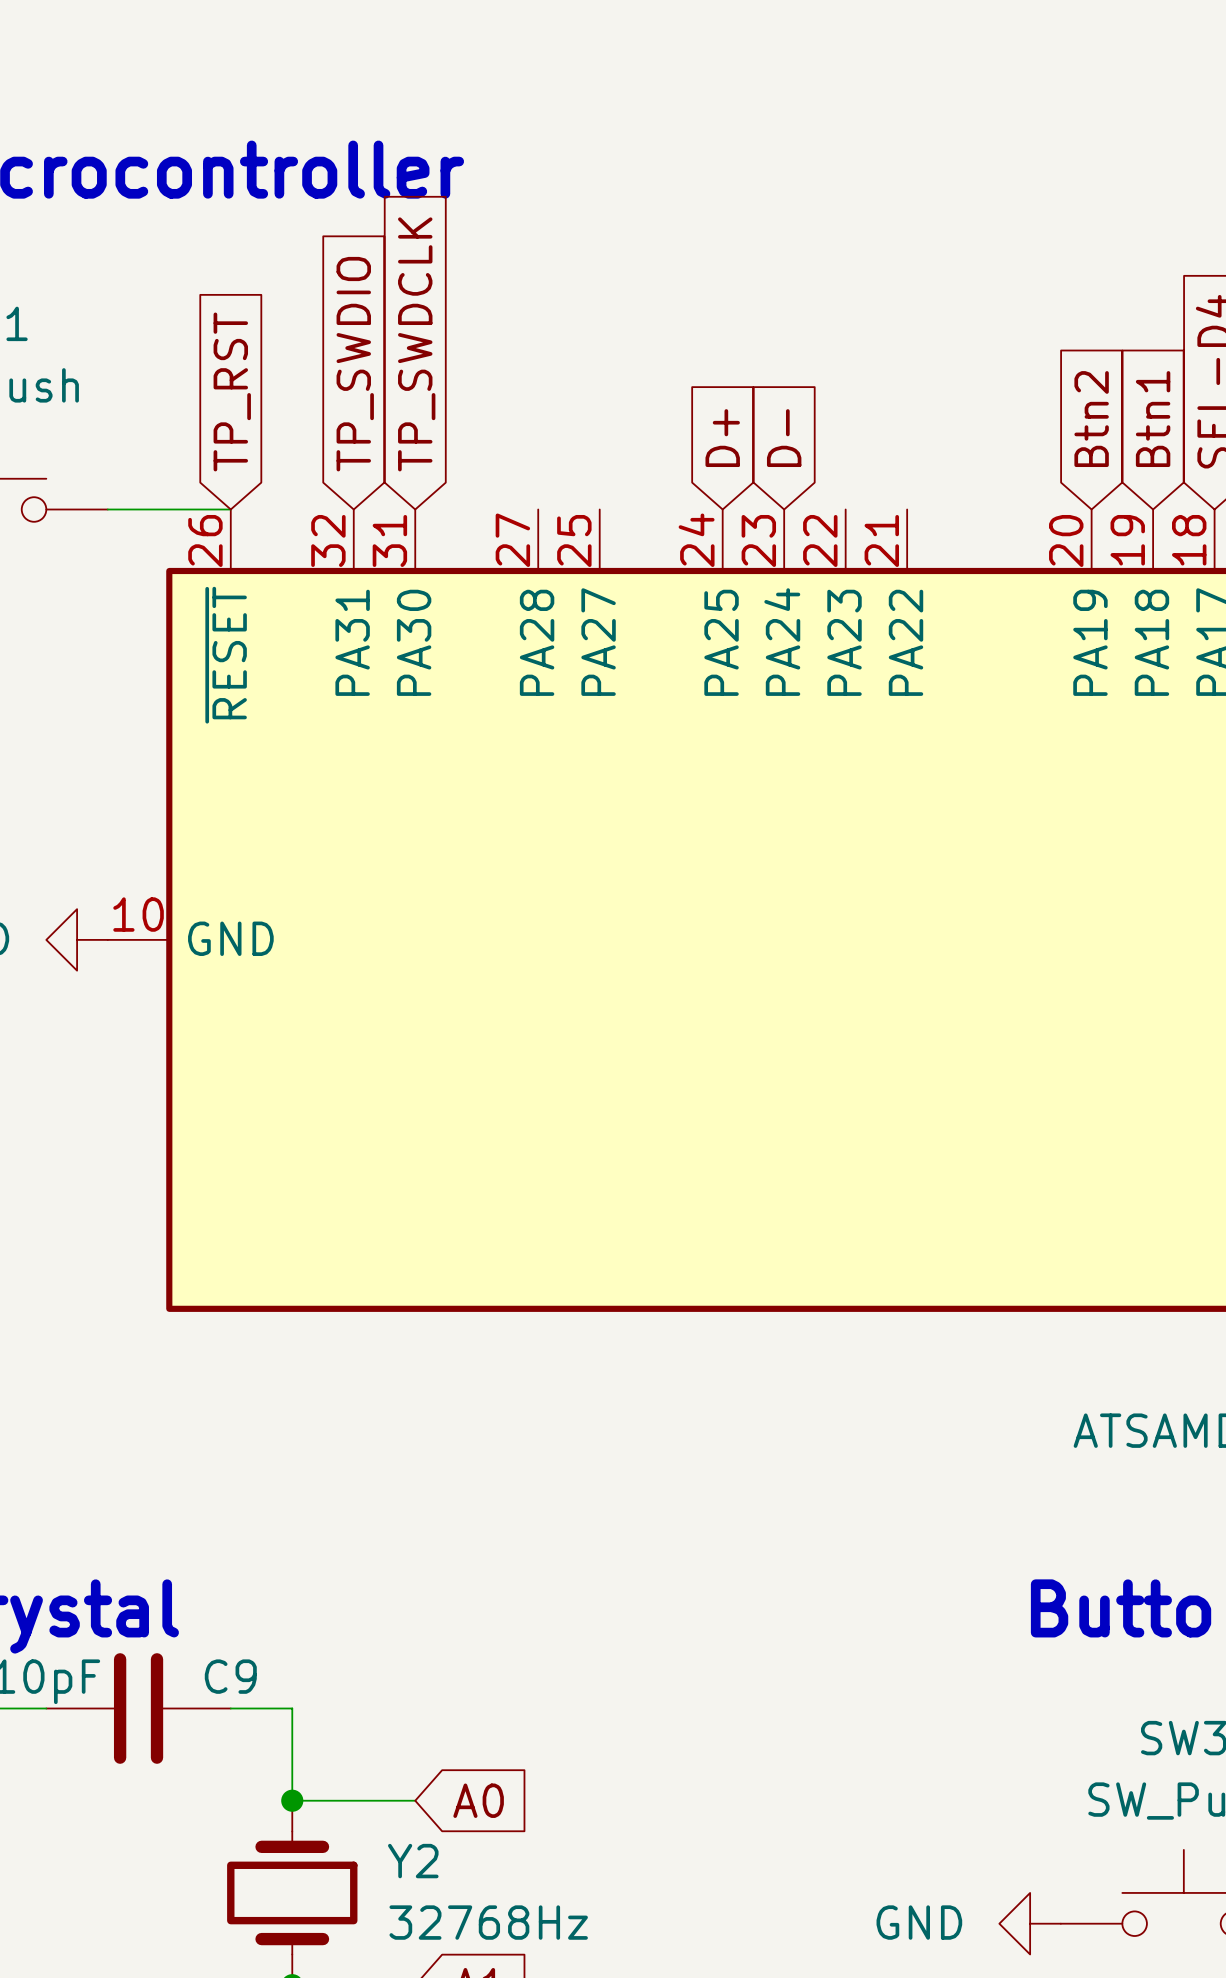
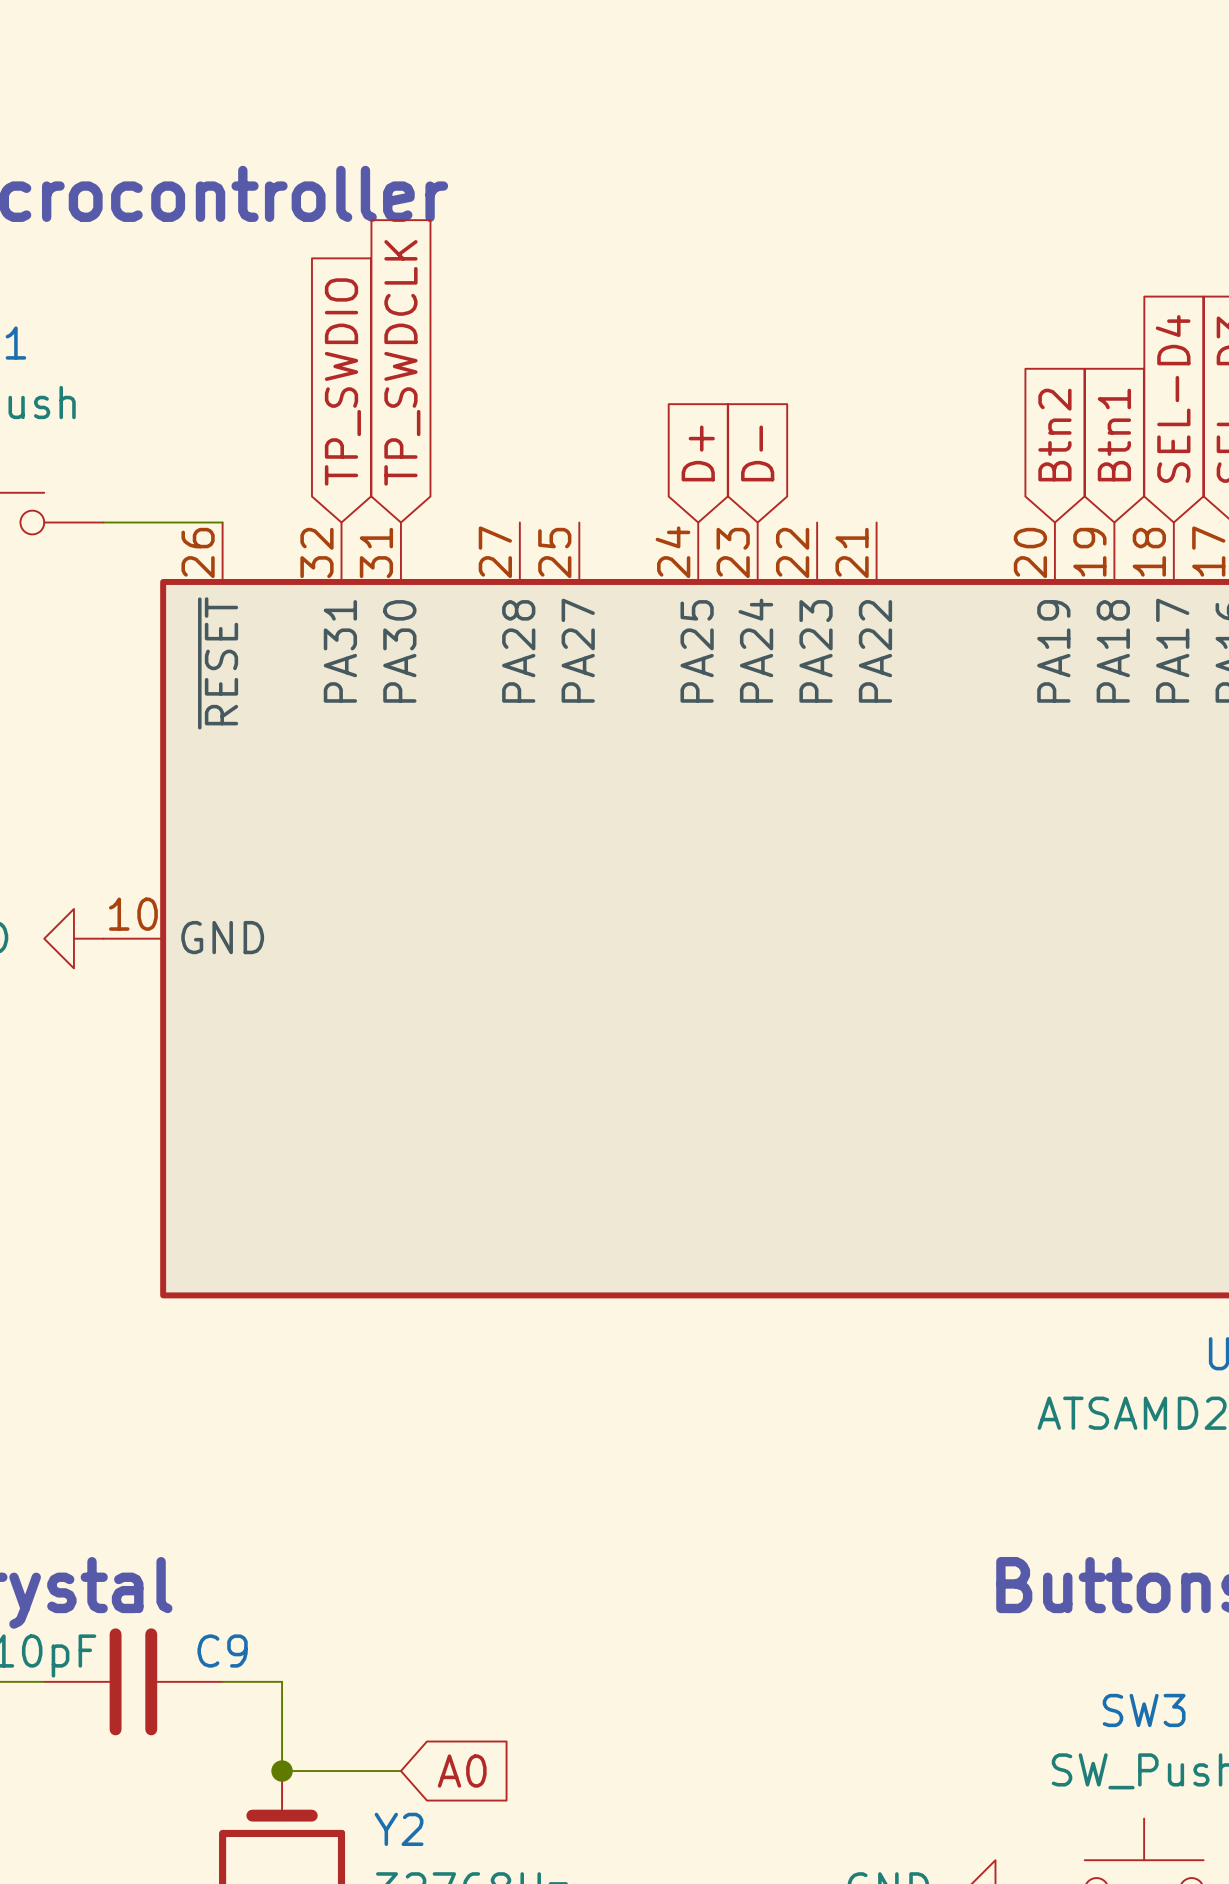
global label: TP_RST (232, 391) -> none

